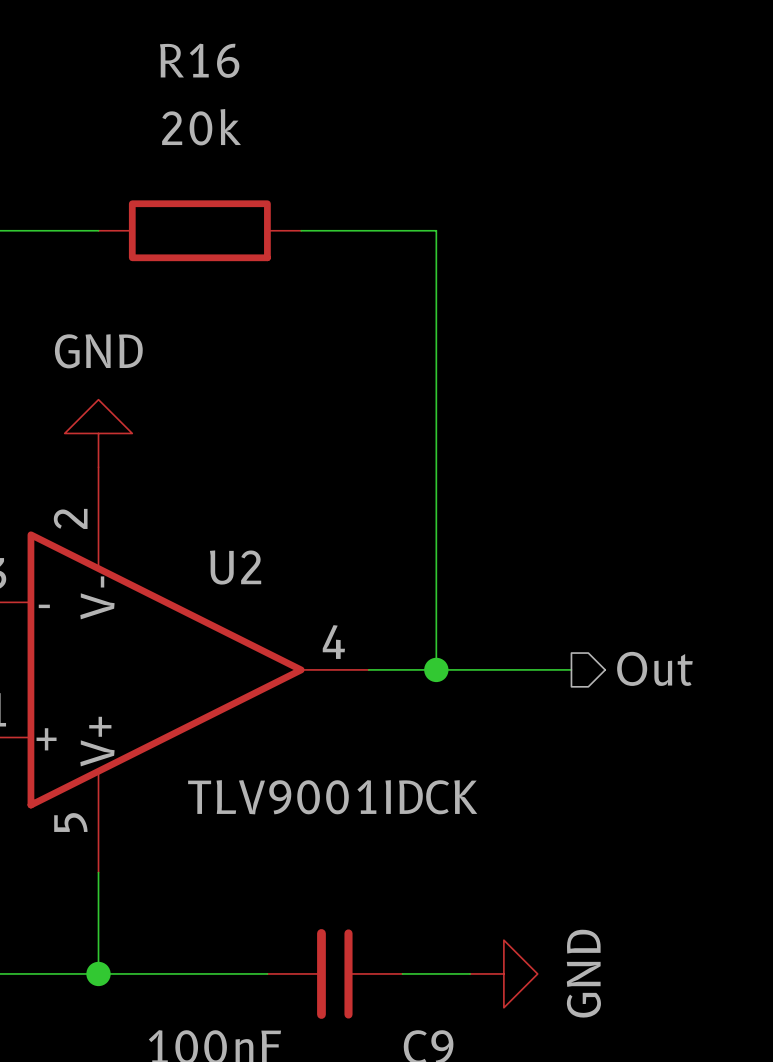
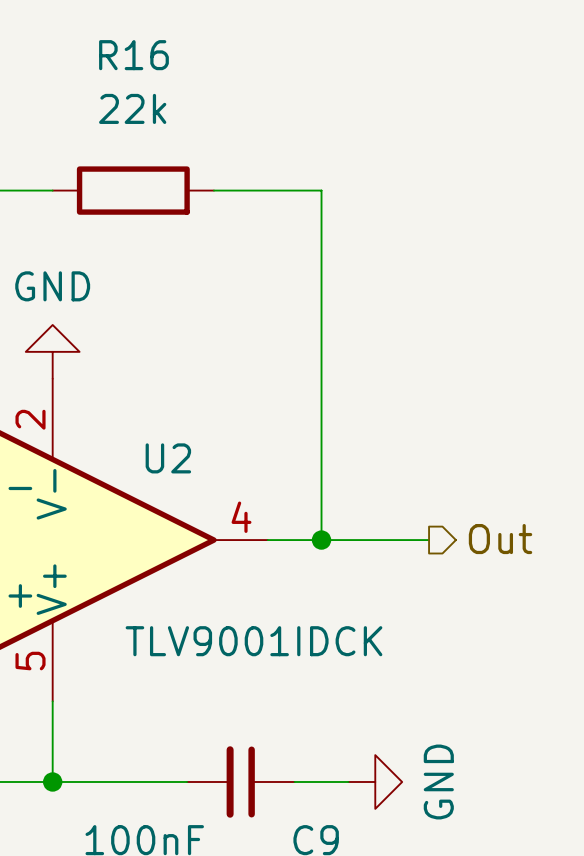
R16 value: 20k (201, 127) -> 22k (132, 108)

